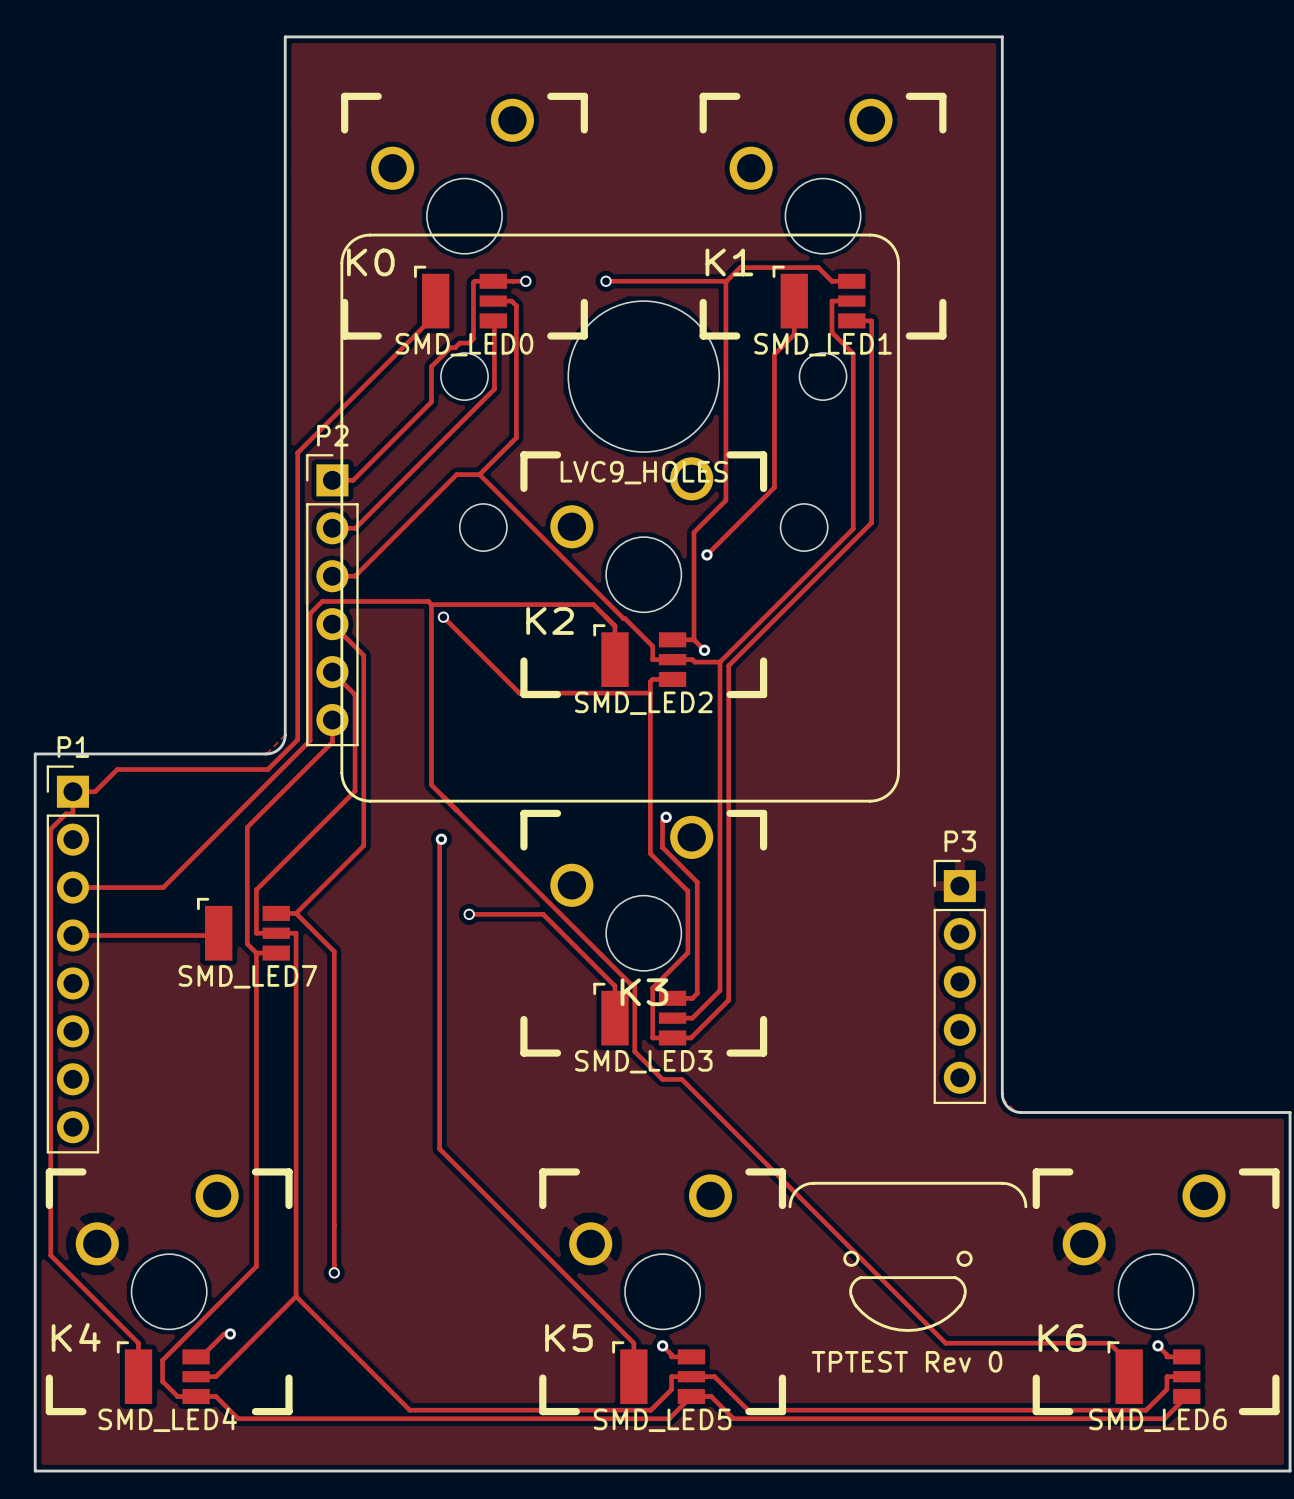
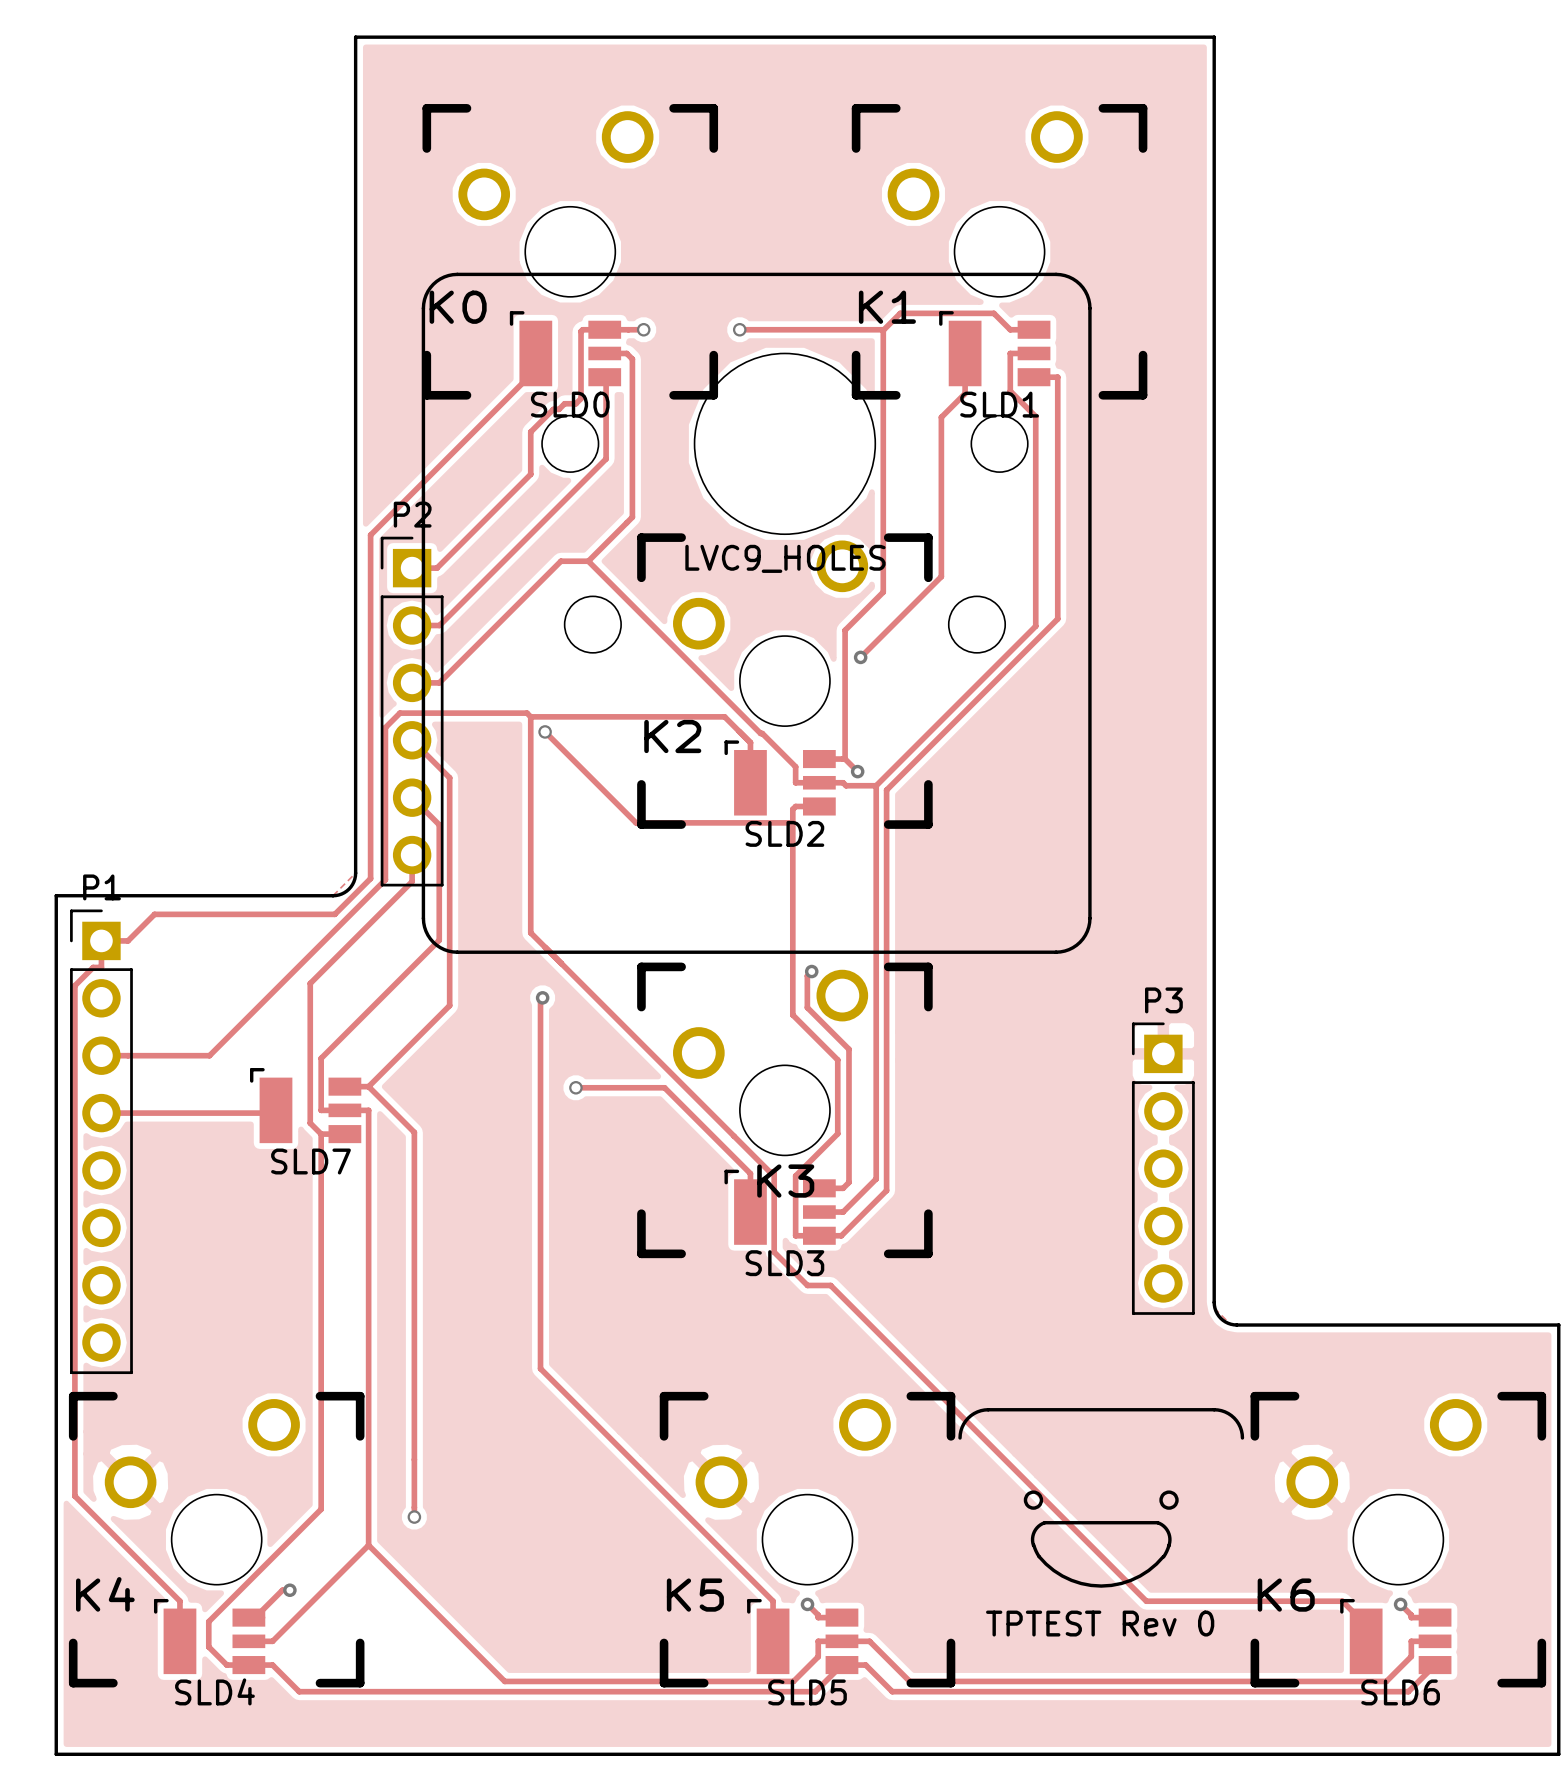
SMD_LED0 name: SMD_LED0 (464, 344) -> SLD0 (570, 404)
SMD_LED1 name: SMD_LED1 (823, 344) -> SLD1 (999, 404)
SMD_LED2 name: SMD_LED2 (643, 703) -> SLD2 (784, 833)
SMD_LED7 name: SMD_LED7 (247, 976) -> SLD7 (310, 1161)
SMD_LED3 name: SMD_LED3 (643, 1061) -> SLD3 (784, 1263)
SMD_LED4 name: SMD_LED4 (167, 1419) -> SLD4 (214, 1691)
SMD_LED5 name: SMD_LED5 (662, 1420) -> SLD5 (807, 1692)
SMD_LED6 name: SMD_LED6 (1157, 1420) -> SLD6 (1400, 1692)

